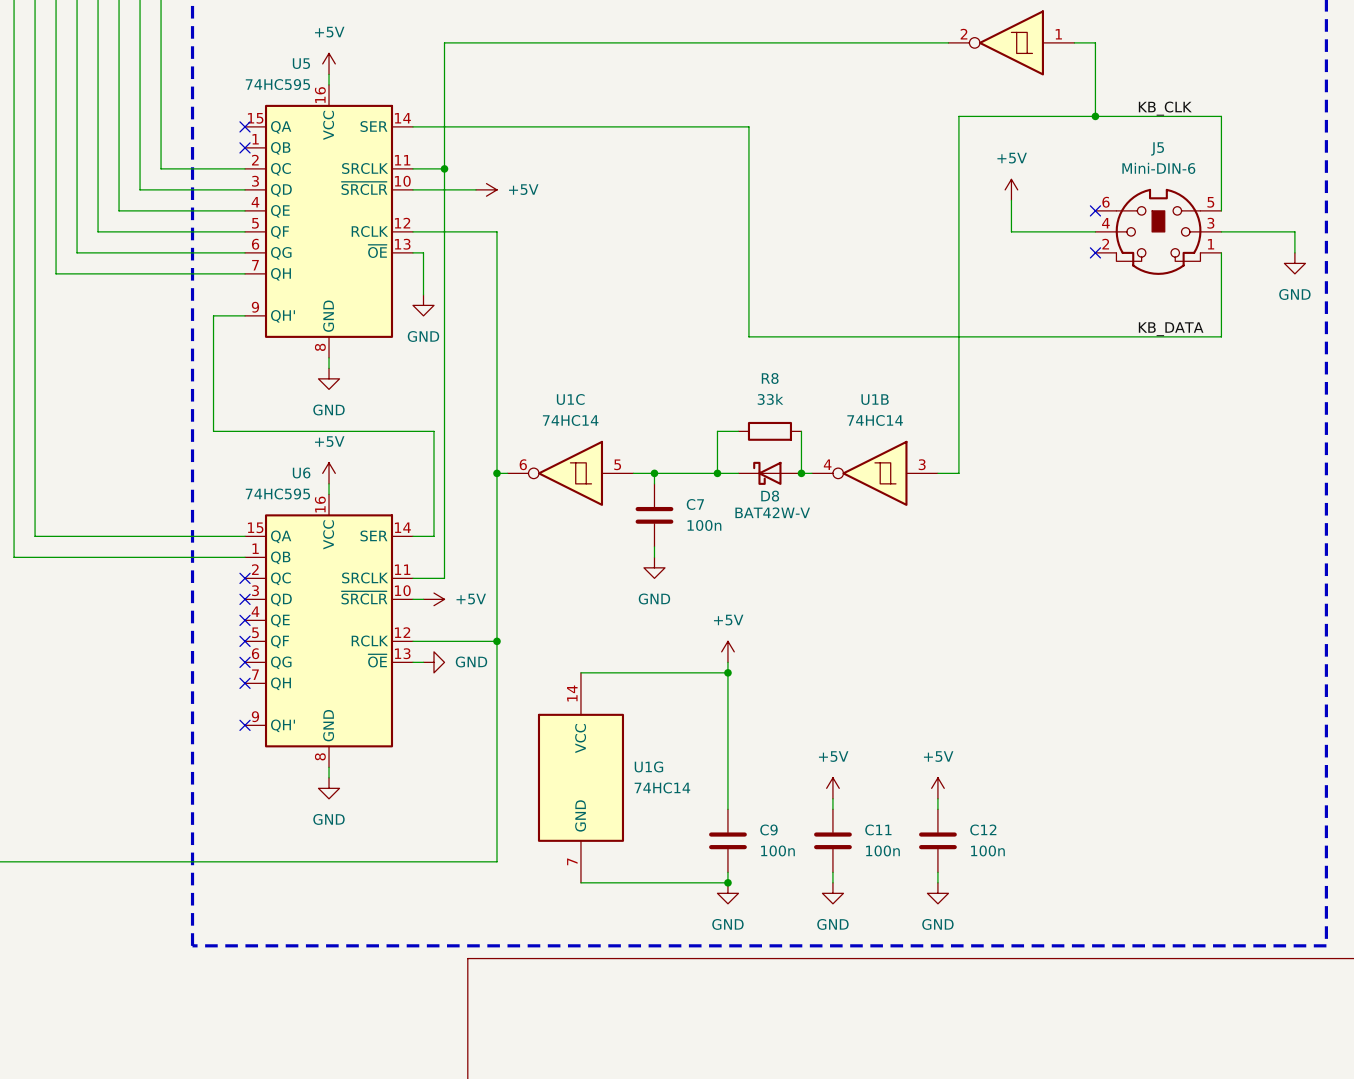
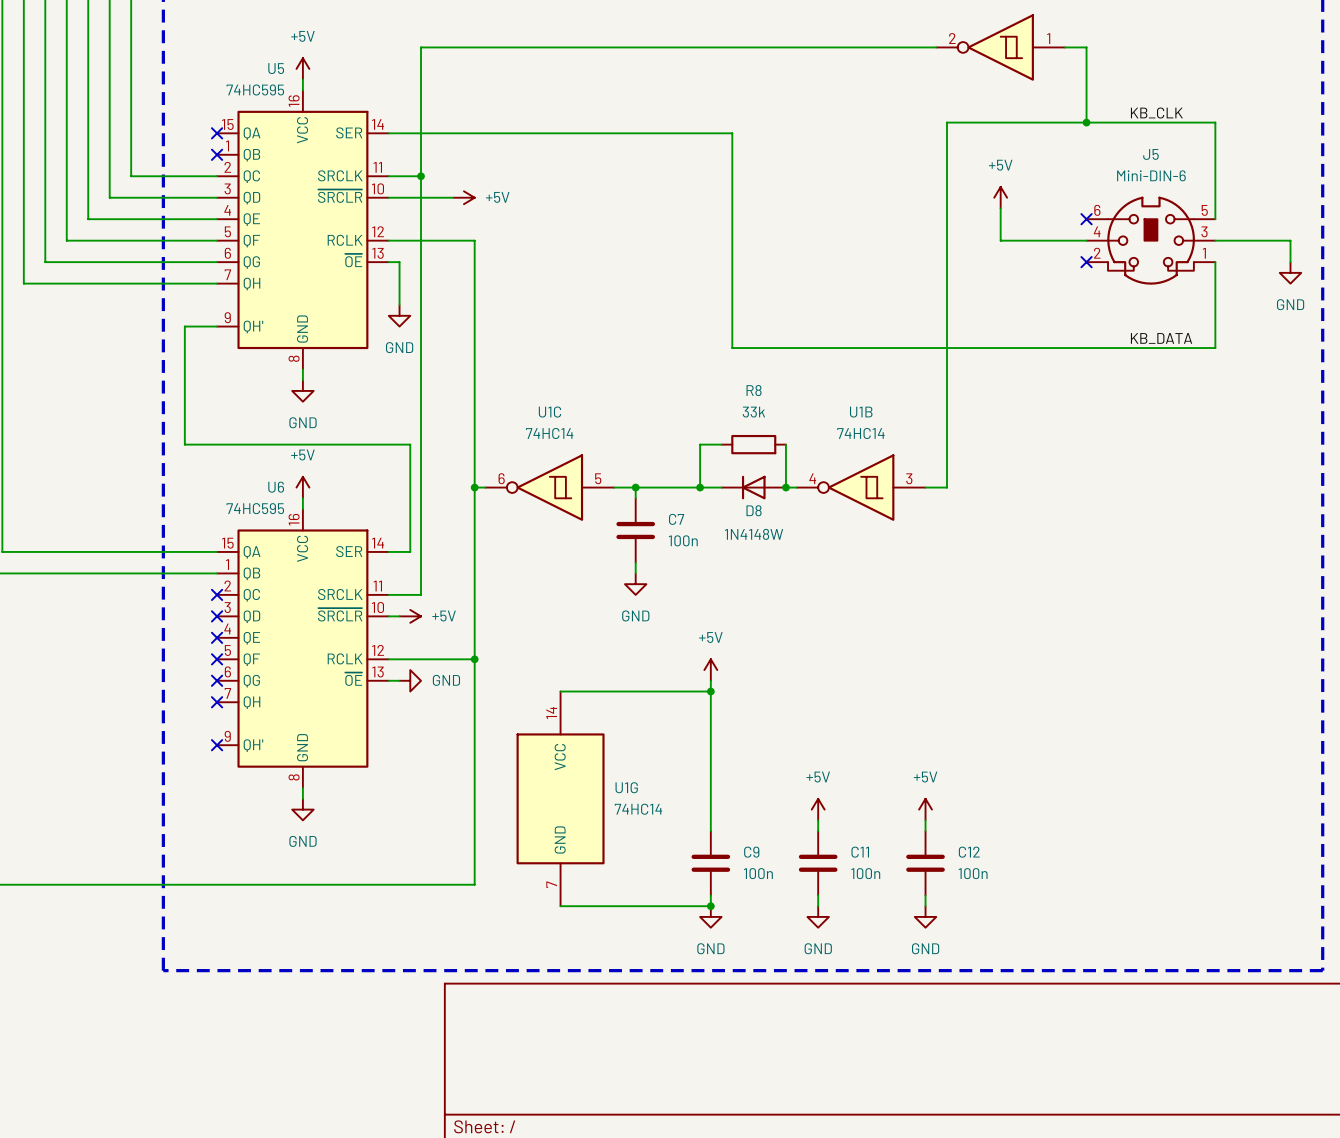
D8 symbol: [738, 461, 802, 485] -> [721, 475, 786, 500]
D8 value: BAT42W-V (772, 512) -> 1N4148W (754, 534)

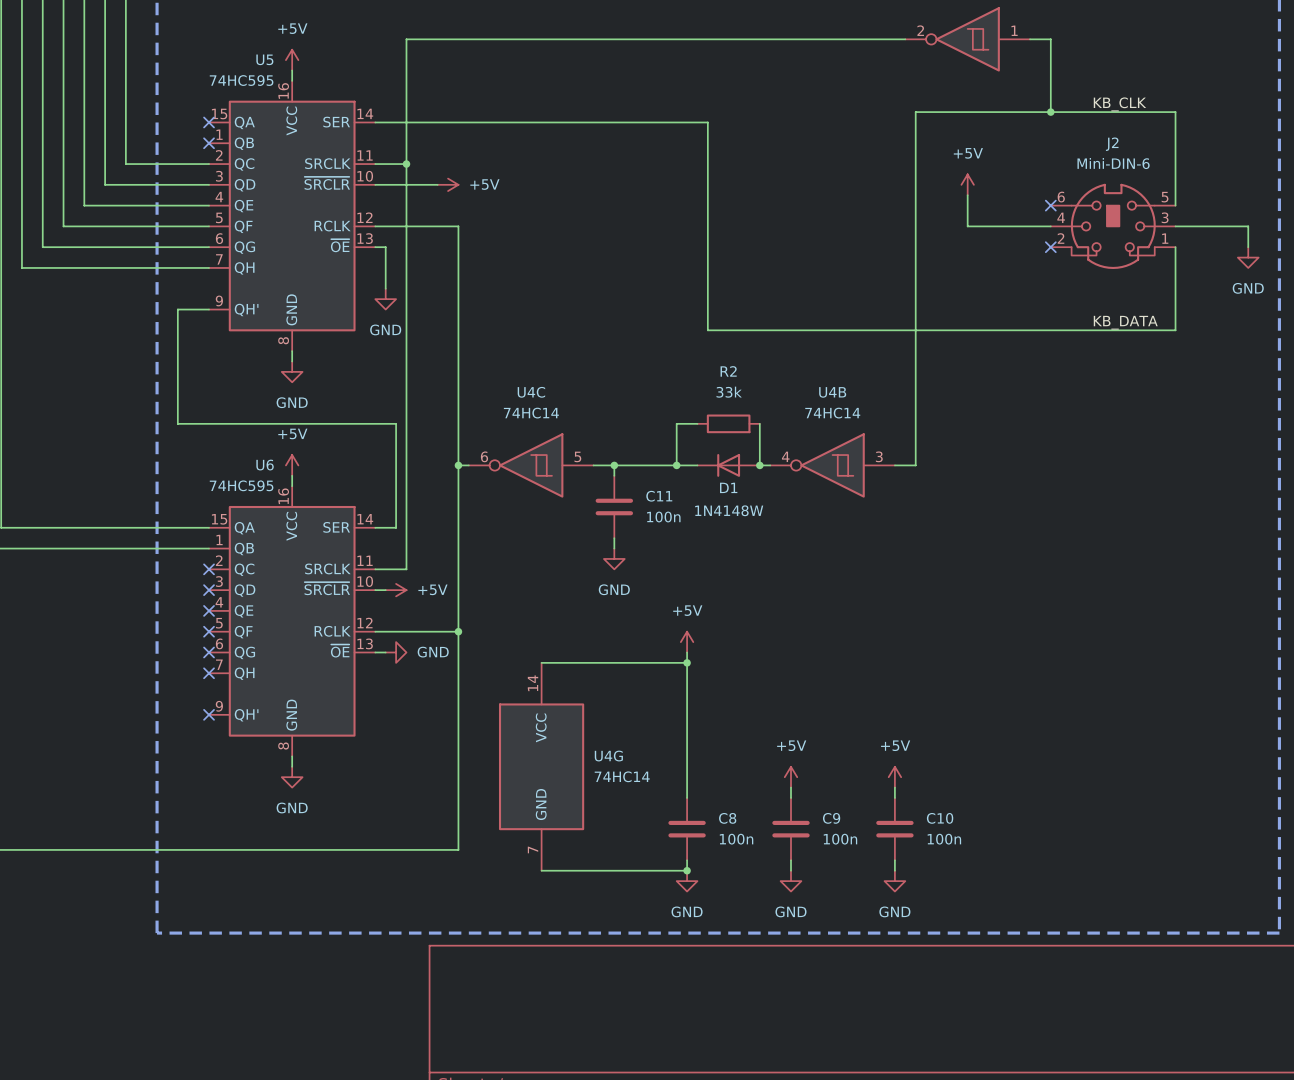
J5 name: J5 (1150, 154) -> J2 (1112, 144)
R8 name: R8 (754, 390) -> R2 (728, 371)
U1C name: U1C (549, 412) -> U4C (531, 392)
U1B name: U1B (861, 412) -> U4B (832, 392)
D8 name: D8 (754, 510) -> D1 (728, 487)
C7 name: C7 (676, 519) -> C11 (659, 496)
U1G name: U1G (626, 787) -> U4G (608, 756)
C9 name: C9 (751, 852) -> C8 (727, 818)
C11 name: C11 (860, 852) -> C9 (831, 818)
C12 name: C12 (969, 852) -> C10 (940, 818)

